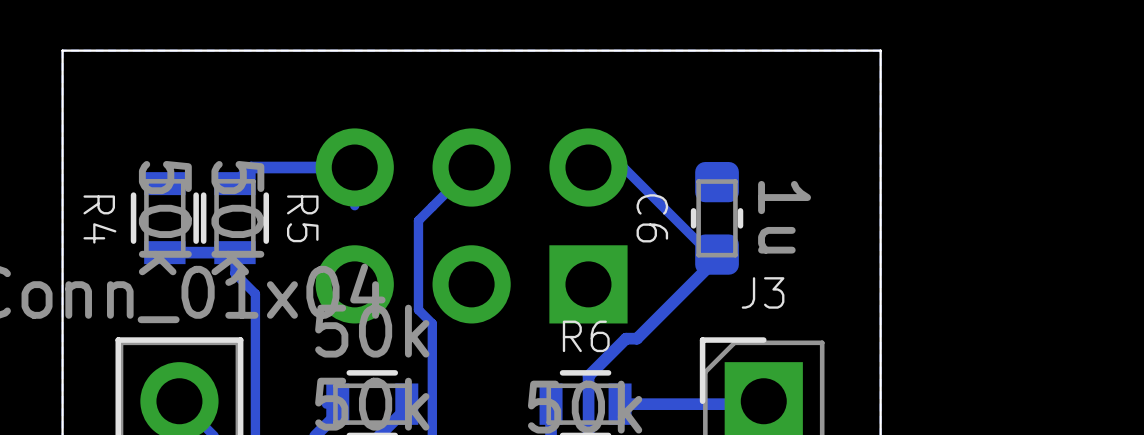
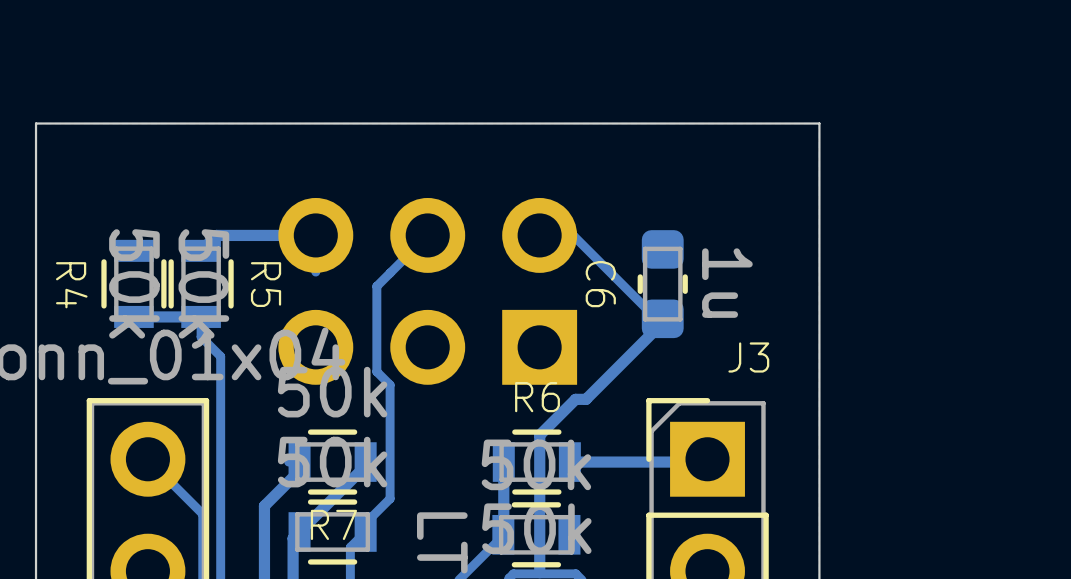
J3 name position: J3 (763, 292) -> J3 (748, 357)

